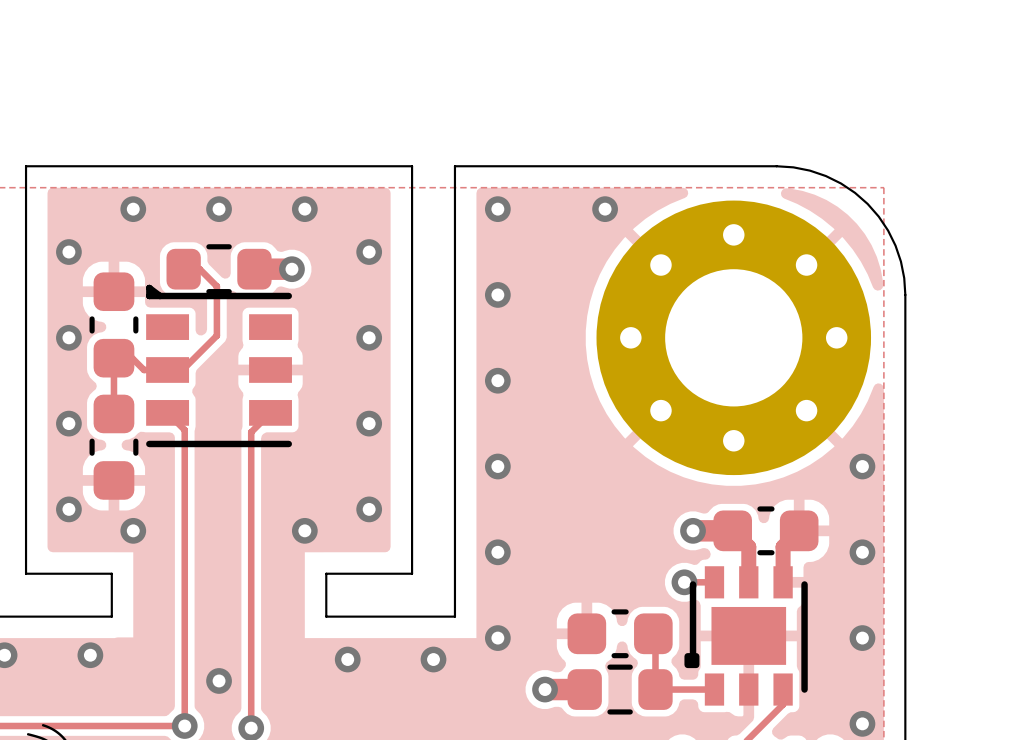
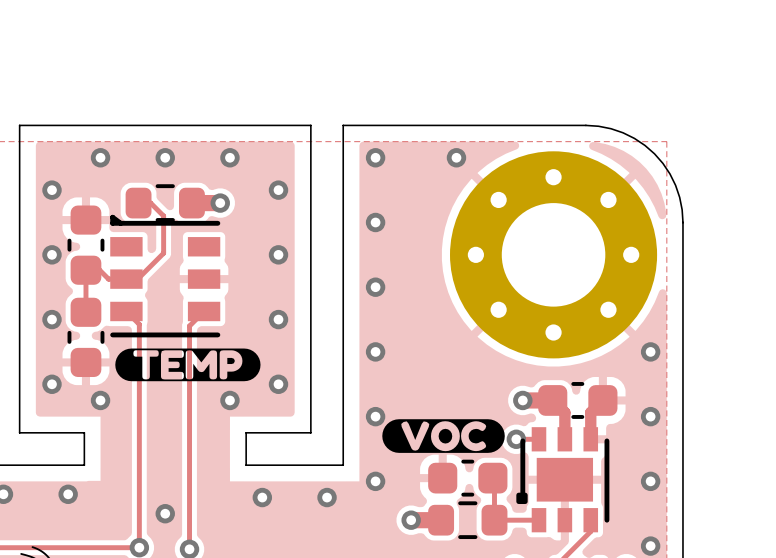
drawing: none -> [115, 348, 261, 382]
drawing: none -> [382, 419, 505, 453]

